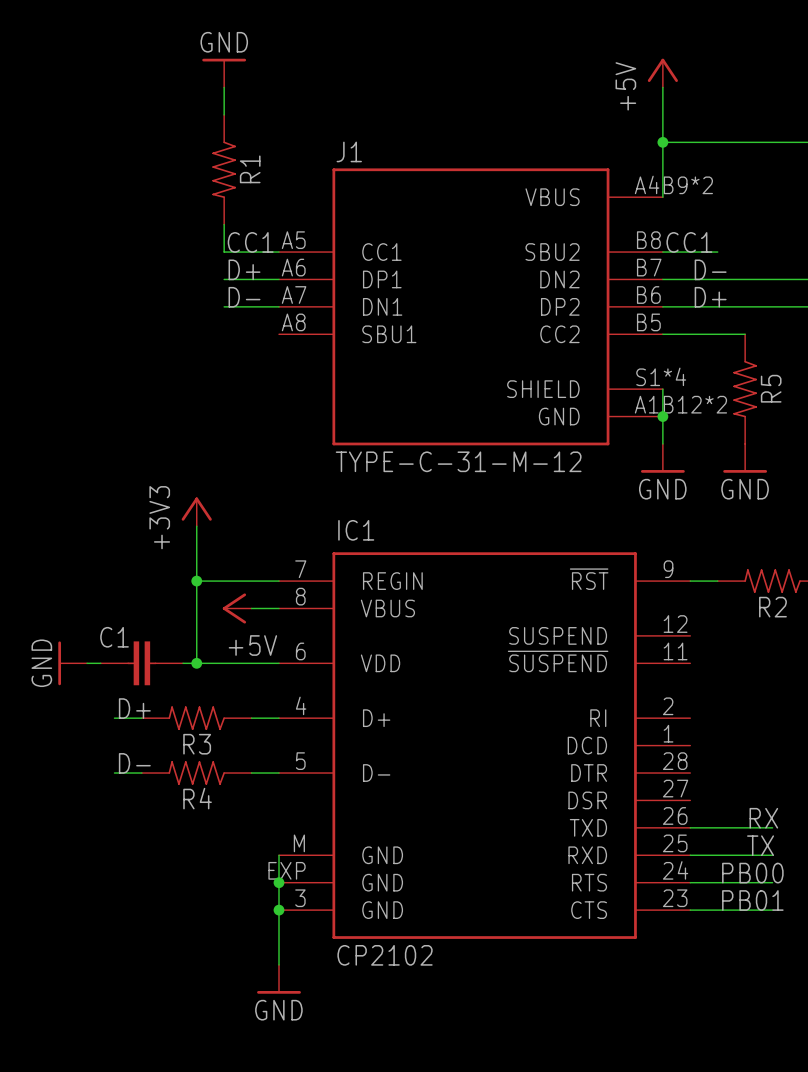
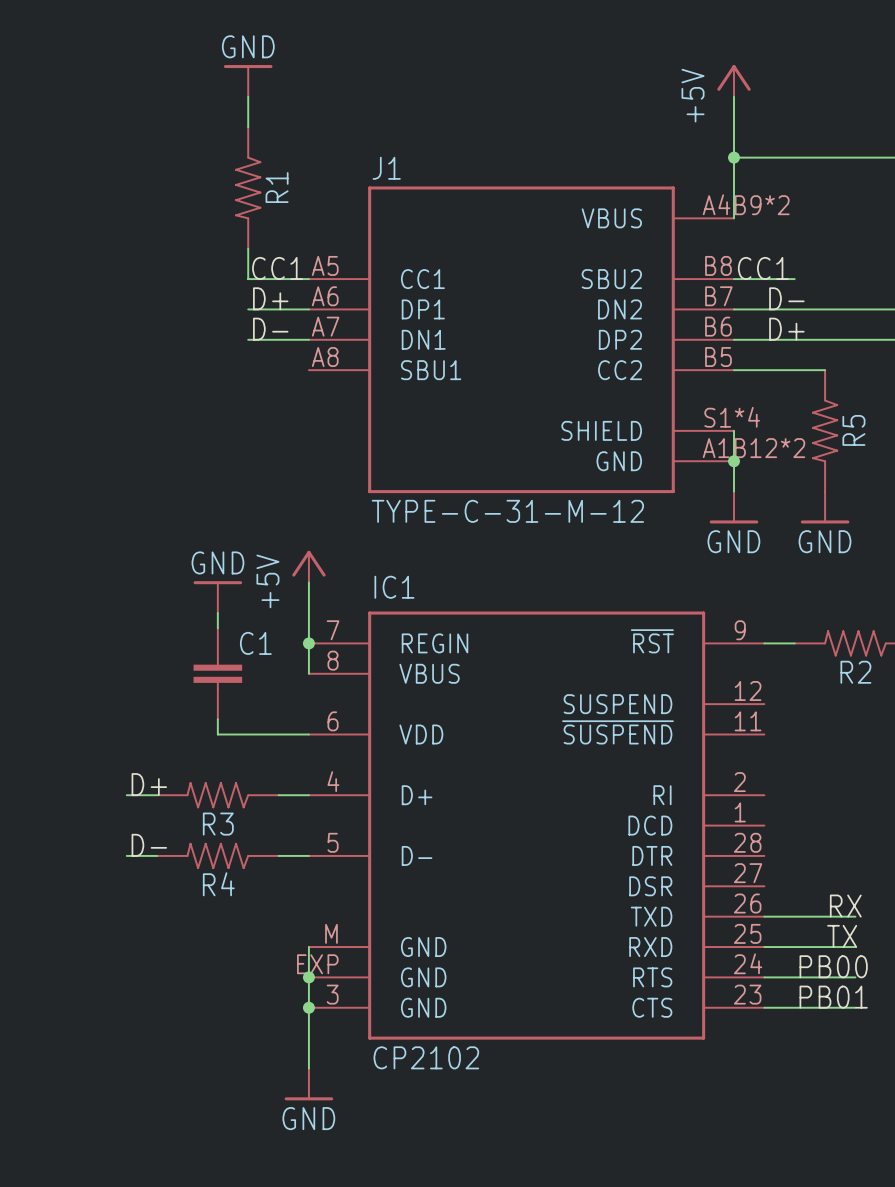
power symbol: +3V3 (196, 511) -> none
wire: (196, 581) (279, 581) -> none
junction: (196, 581) -> none
junction: none -> (308, 643)
power symbol rotation: 0° (234, 608) -> 90° clockwise (308, 563)
power symbol position: +5V (237, 608) -> +5V (308, 566)
wire: (251, 608) (279, 608) -> (308, 582) (308, 673)
power symbol rotation: 0° (59, 663) -> 90° clockwise (217, 582)
power symbol position: GND (72, 663) -> GND (217, 597)
wire: (87, 663) (100, 663) -> none
C1 rotation: 0° (141, 663) -> 90° clockwise (217, 673)
C1 position: (141, 663) -> (217, 673)
wire: (183, 663) (196, 663) -> none
junction: (196, 663) -> none

